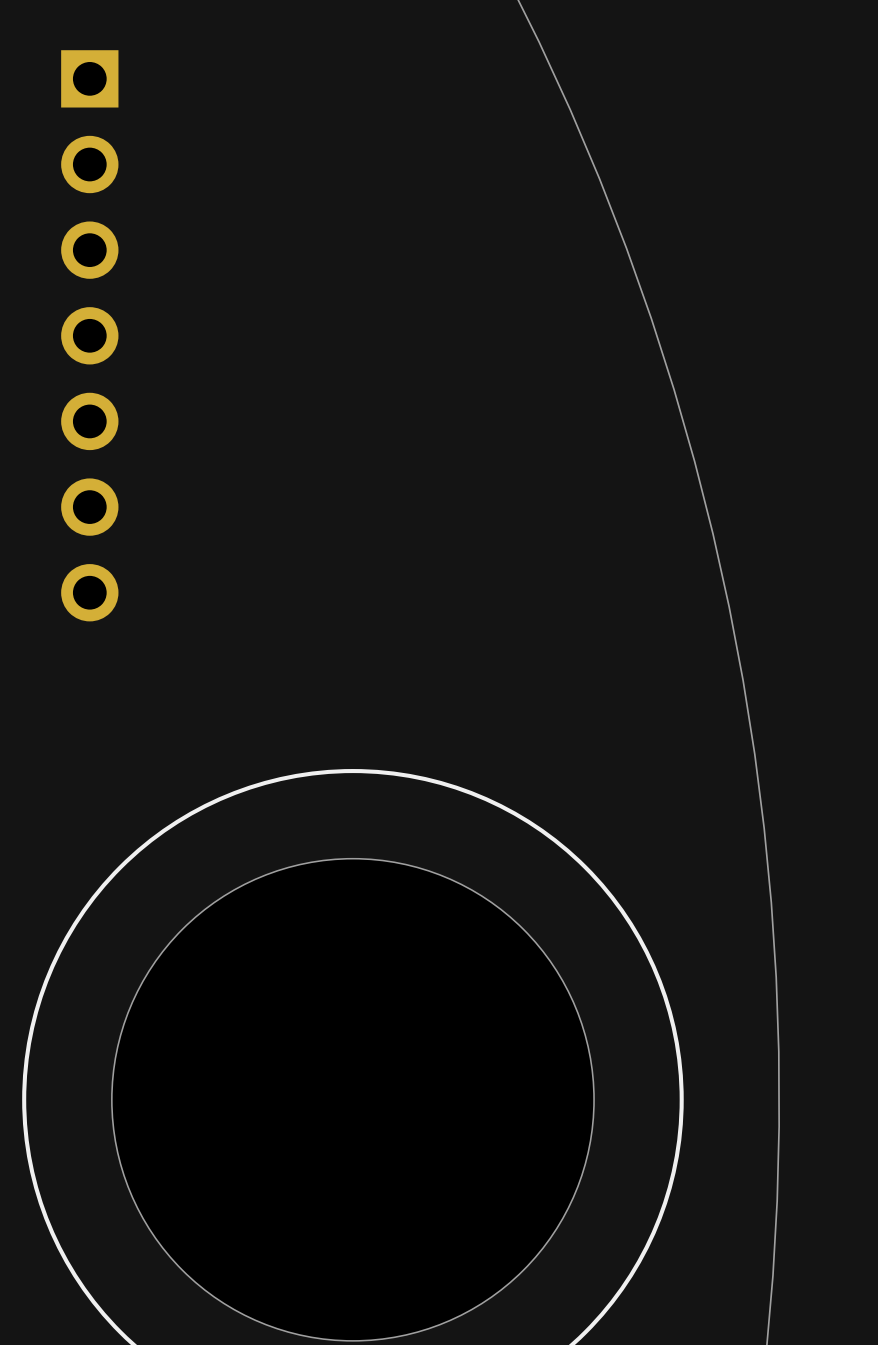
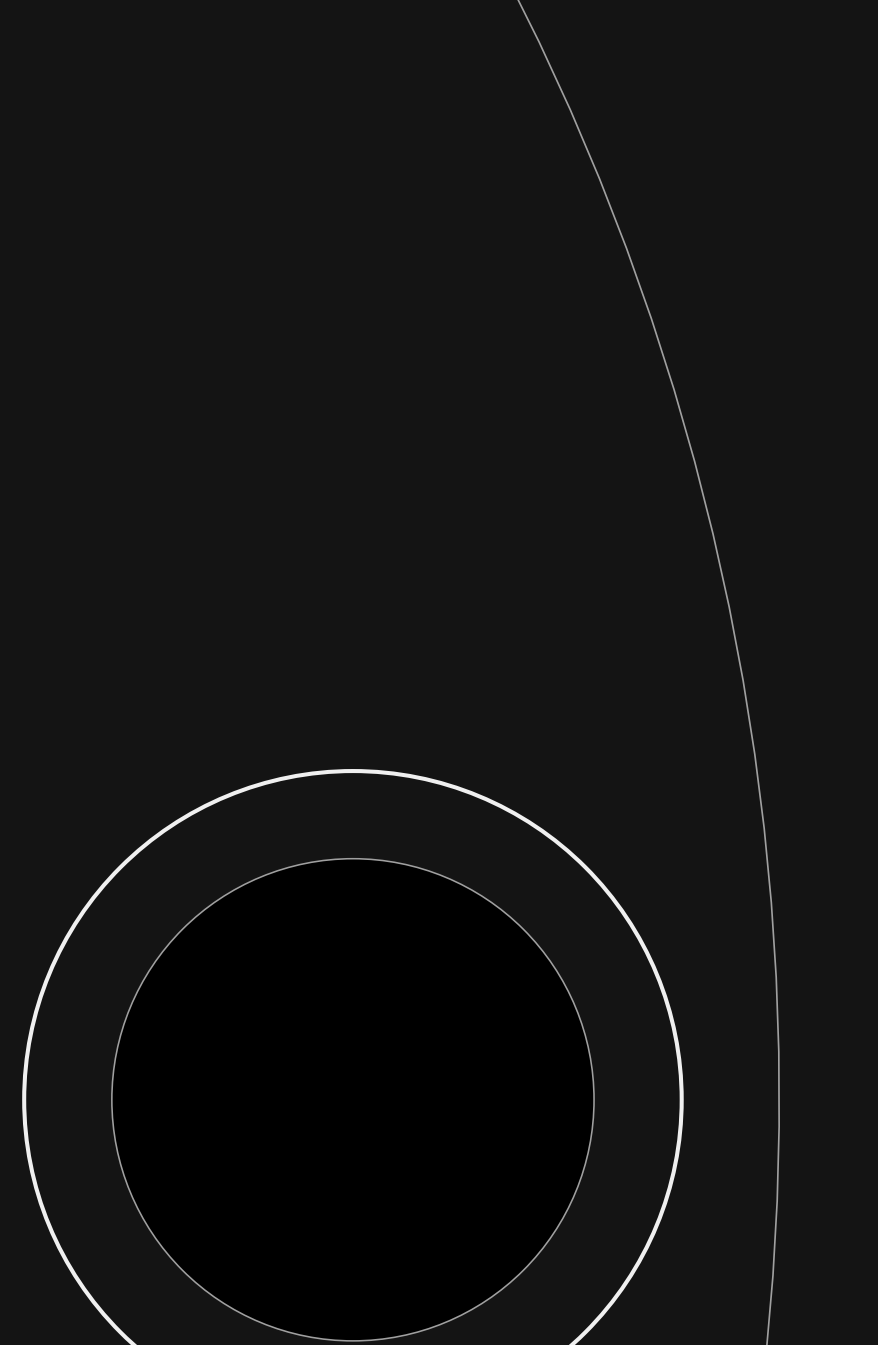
part: (89, 335) -> none

